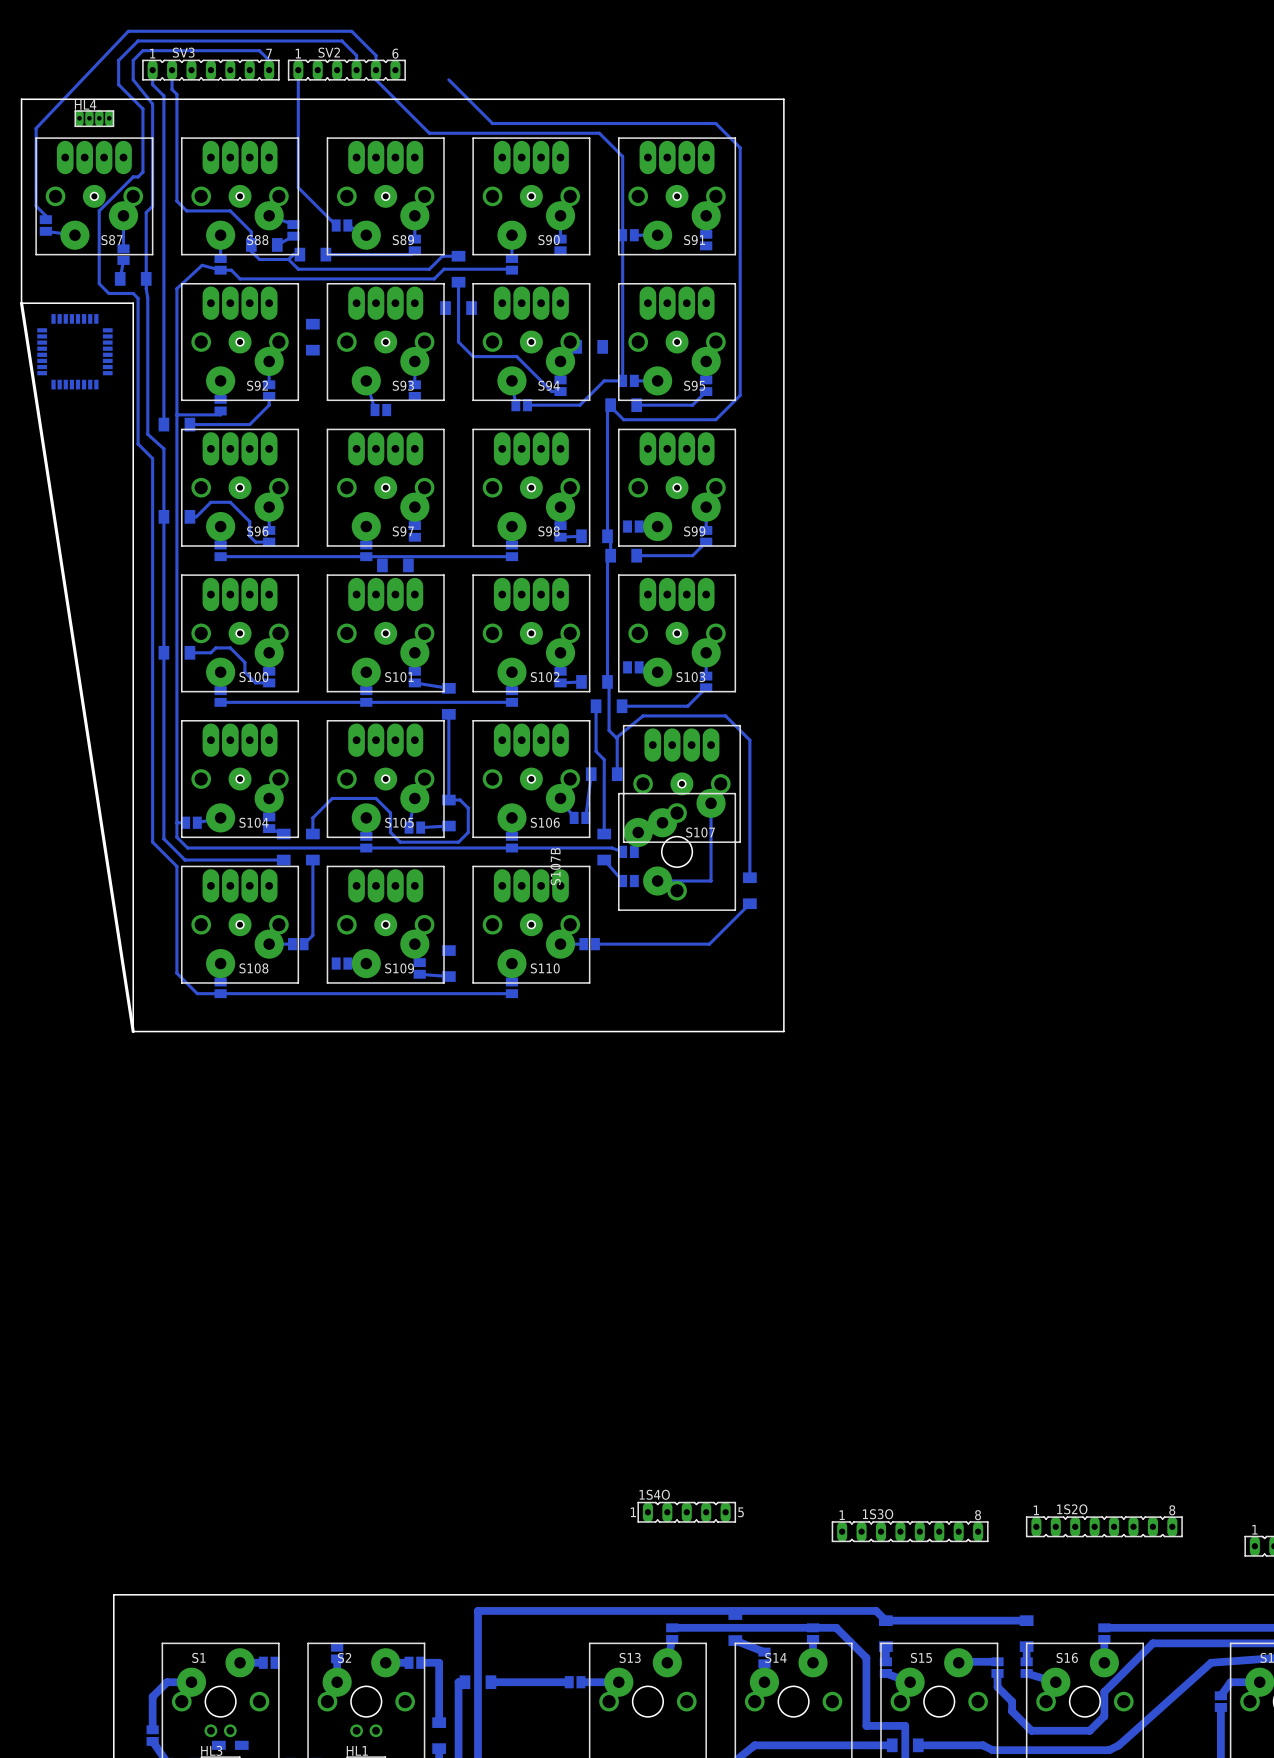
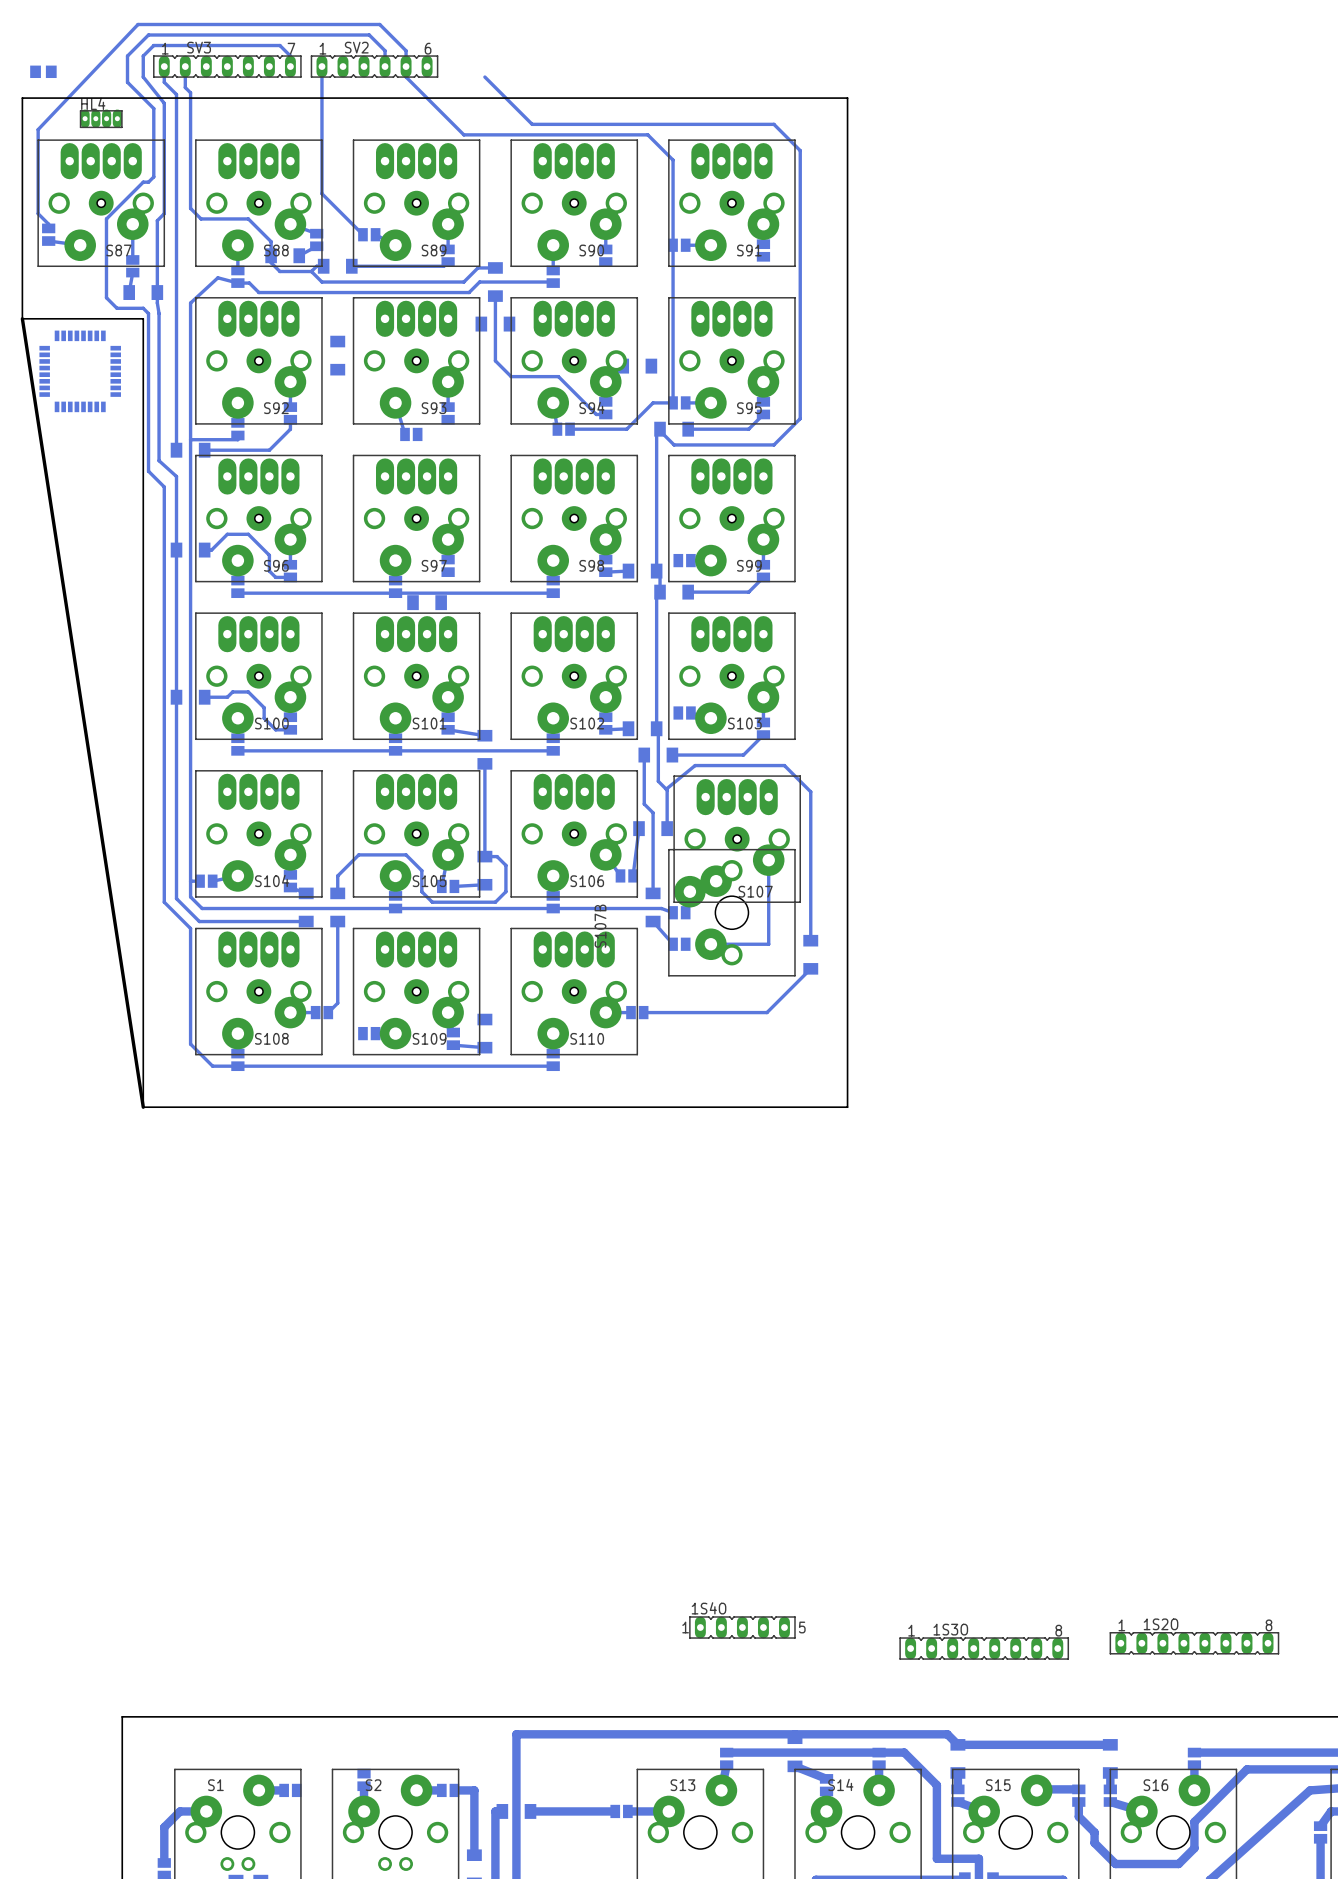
part: none -> (43, 71)

